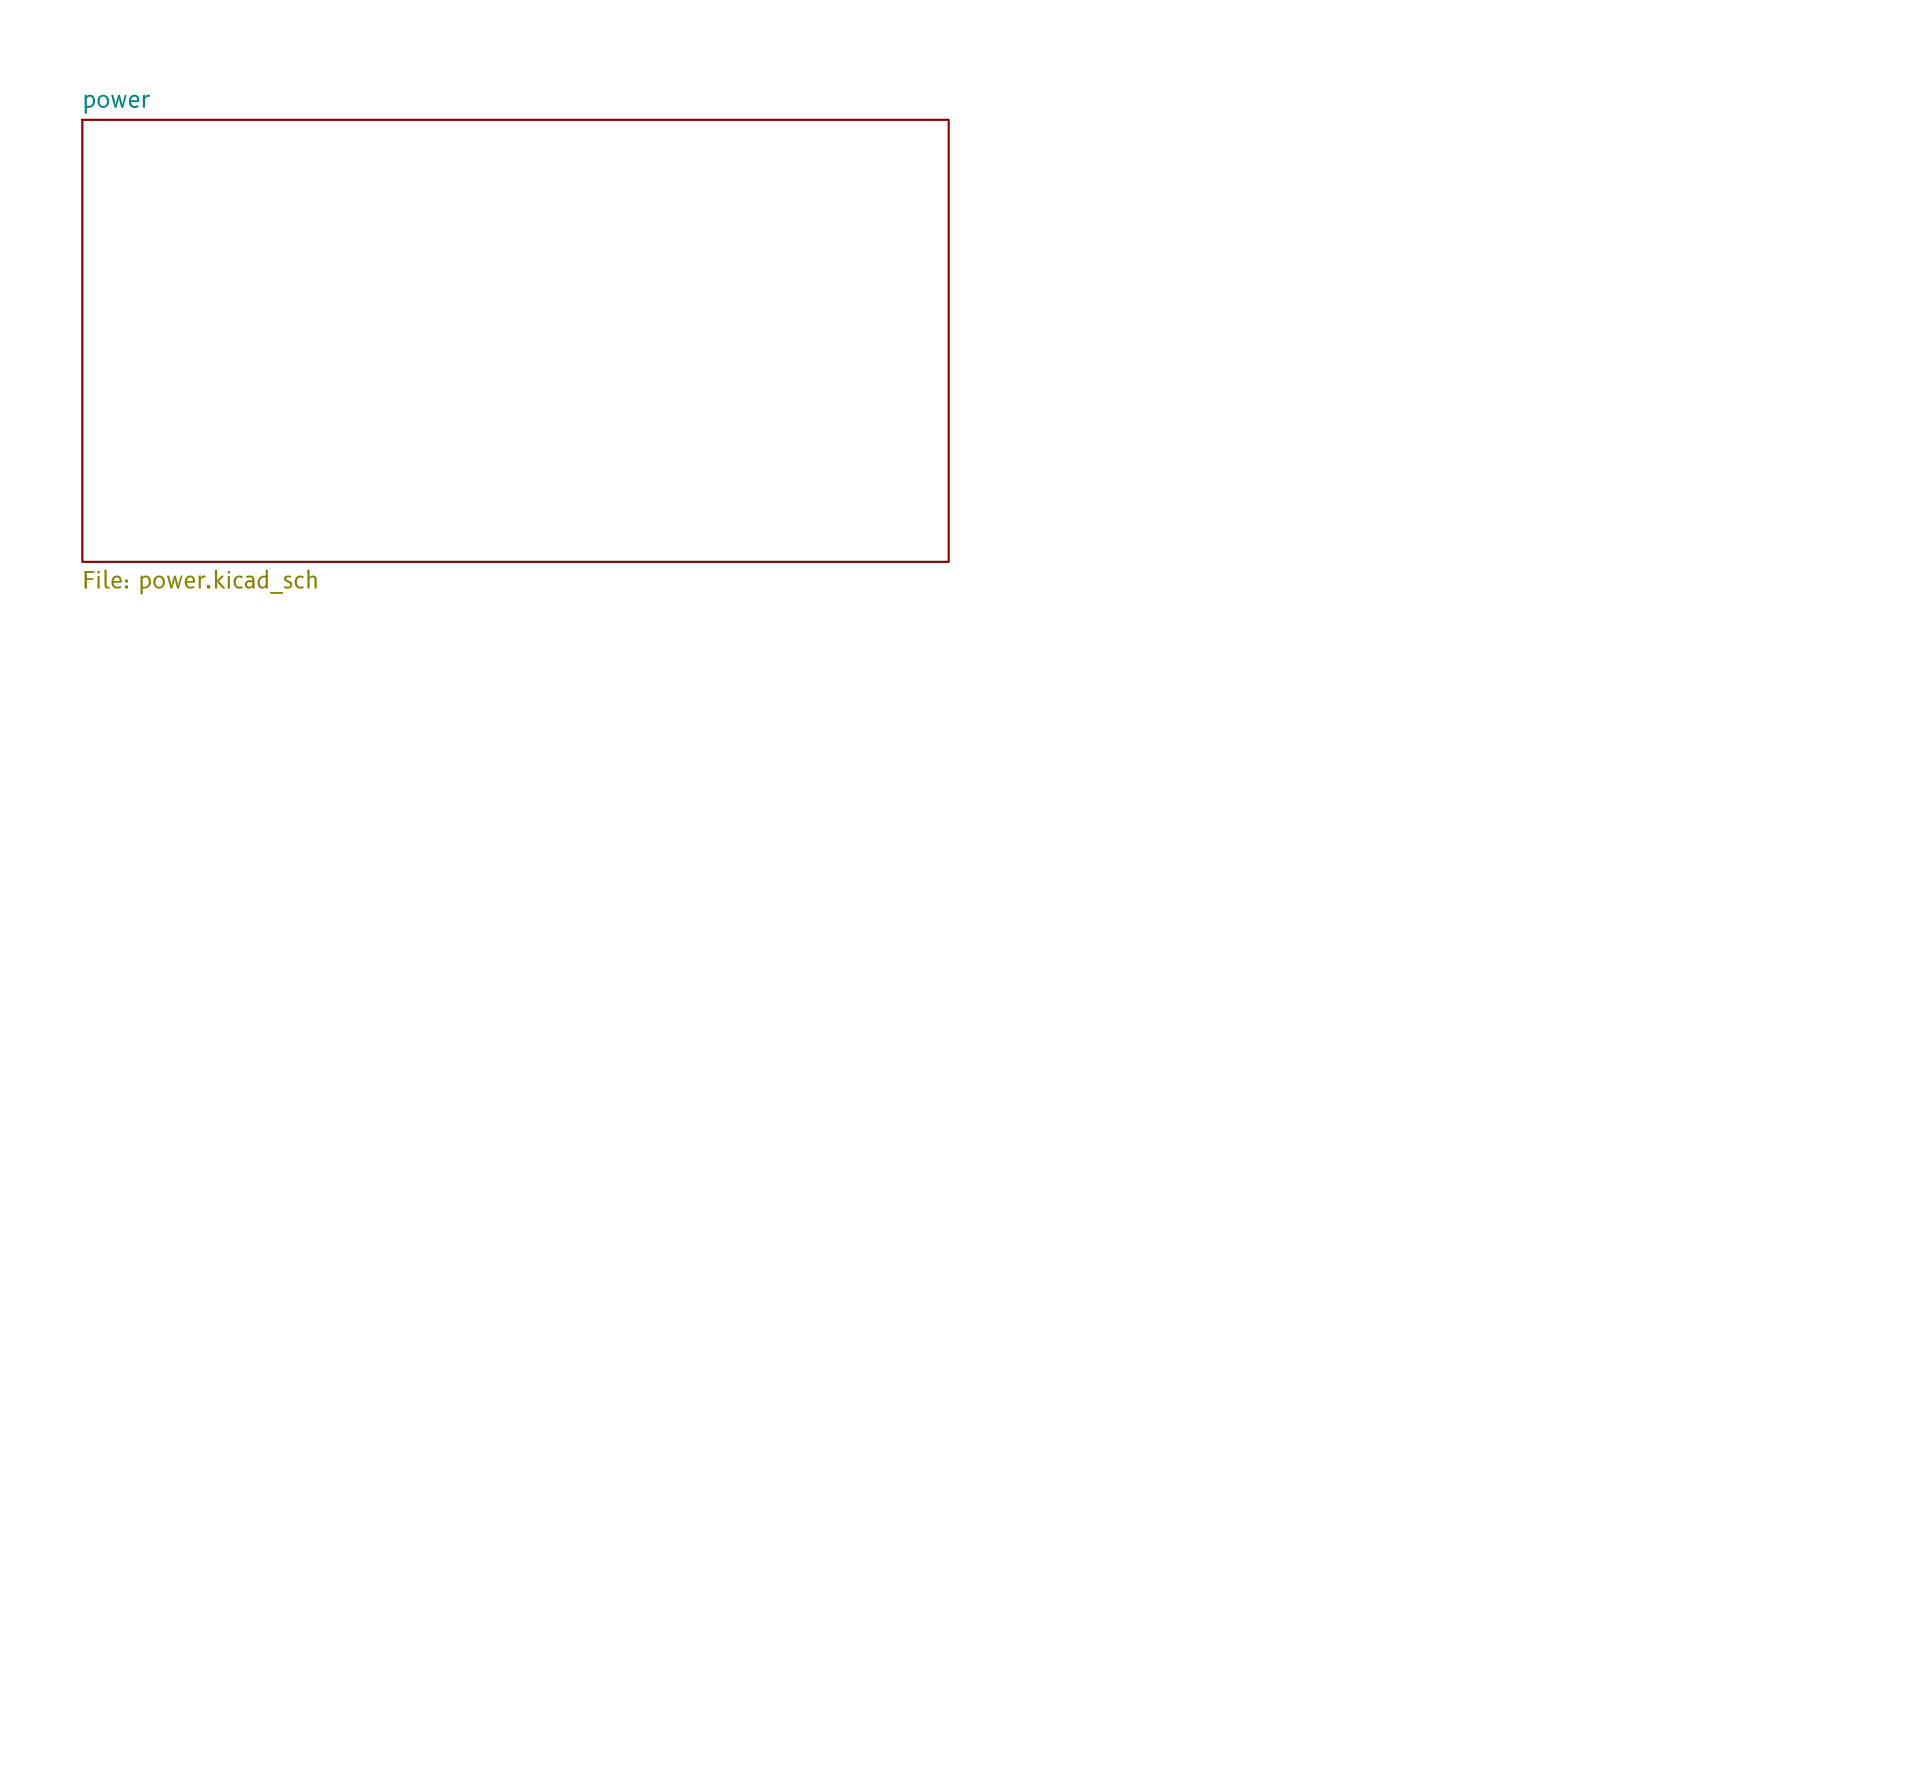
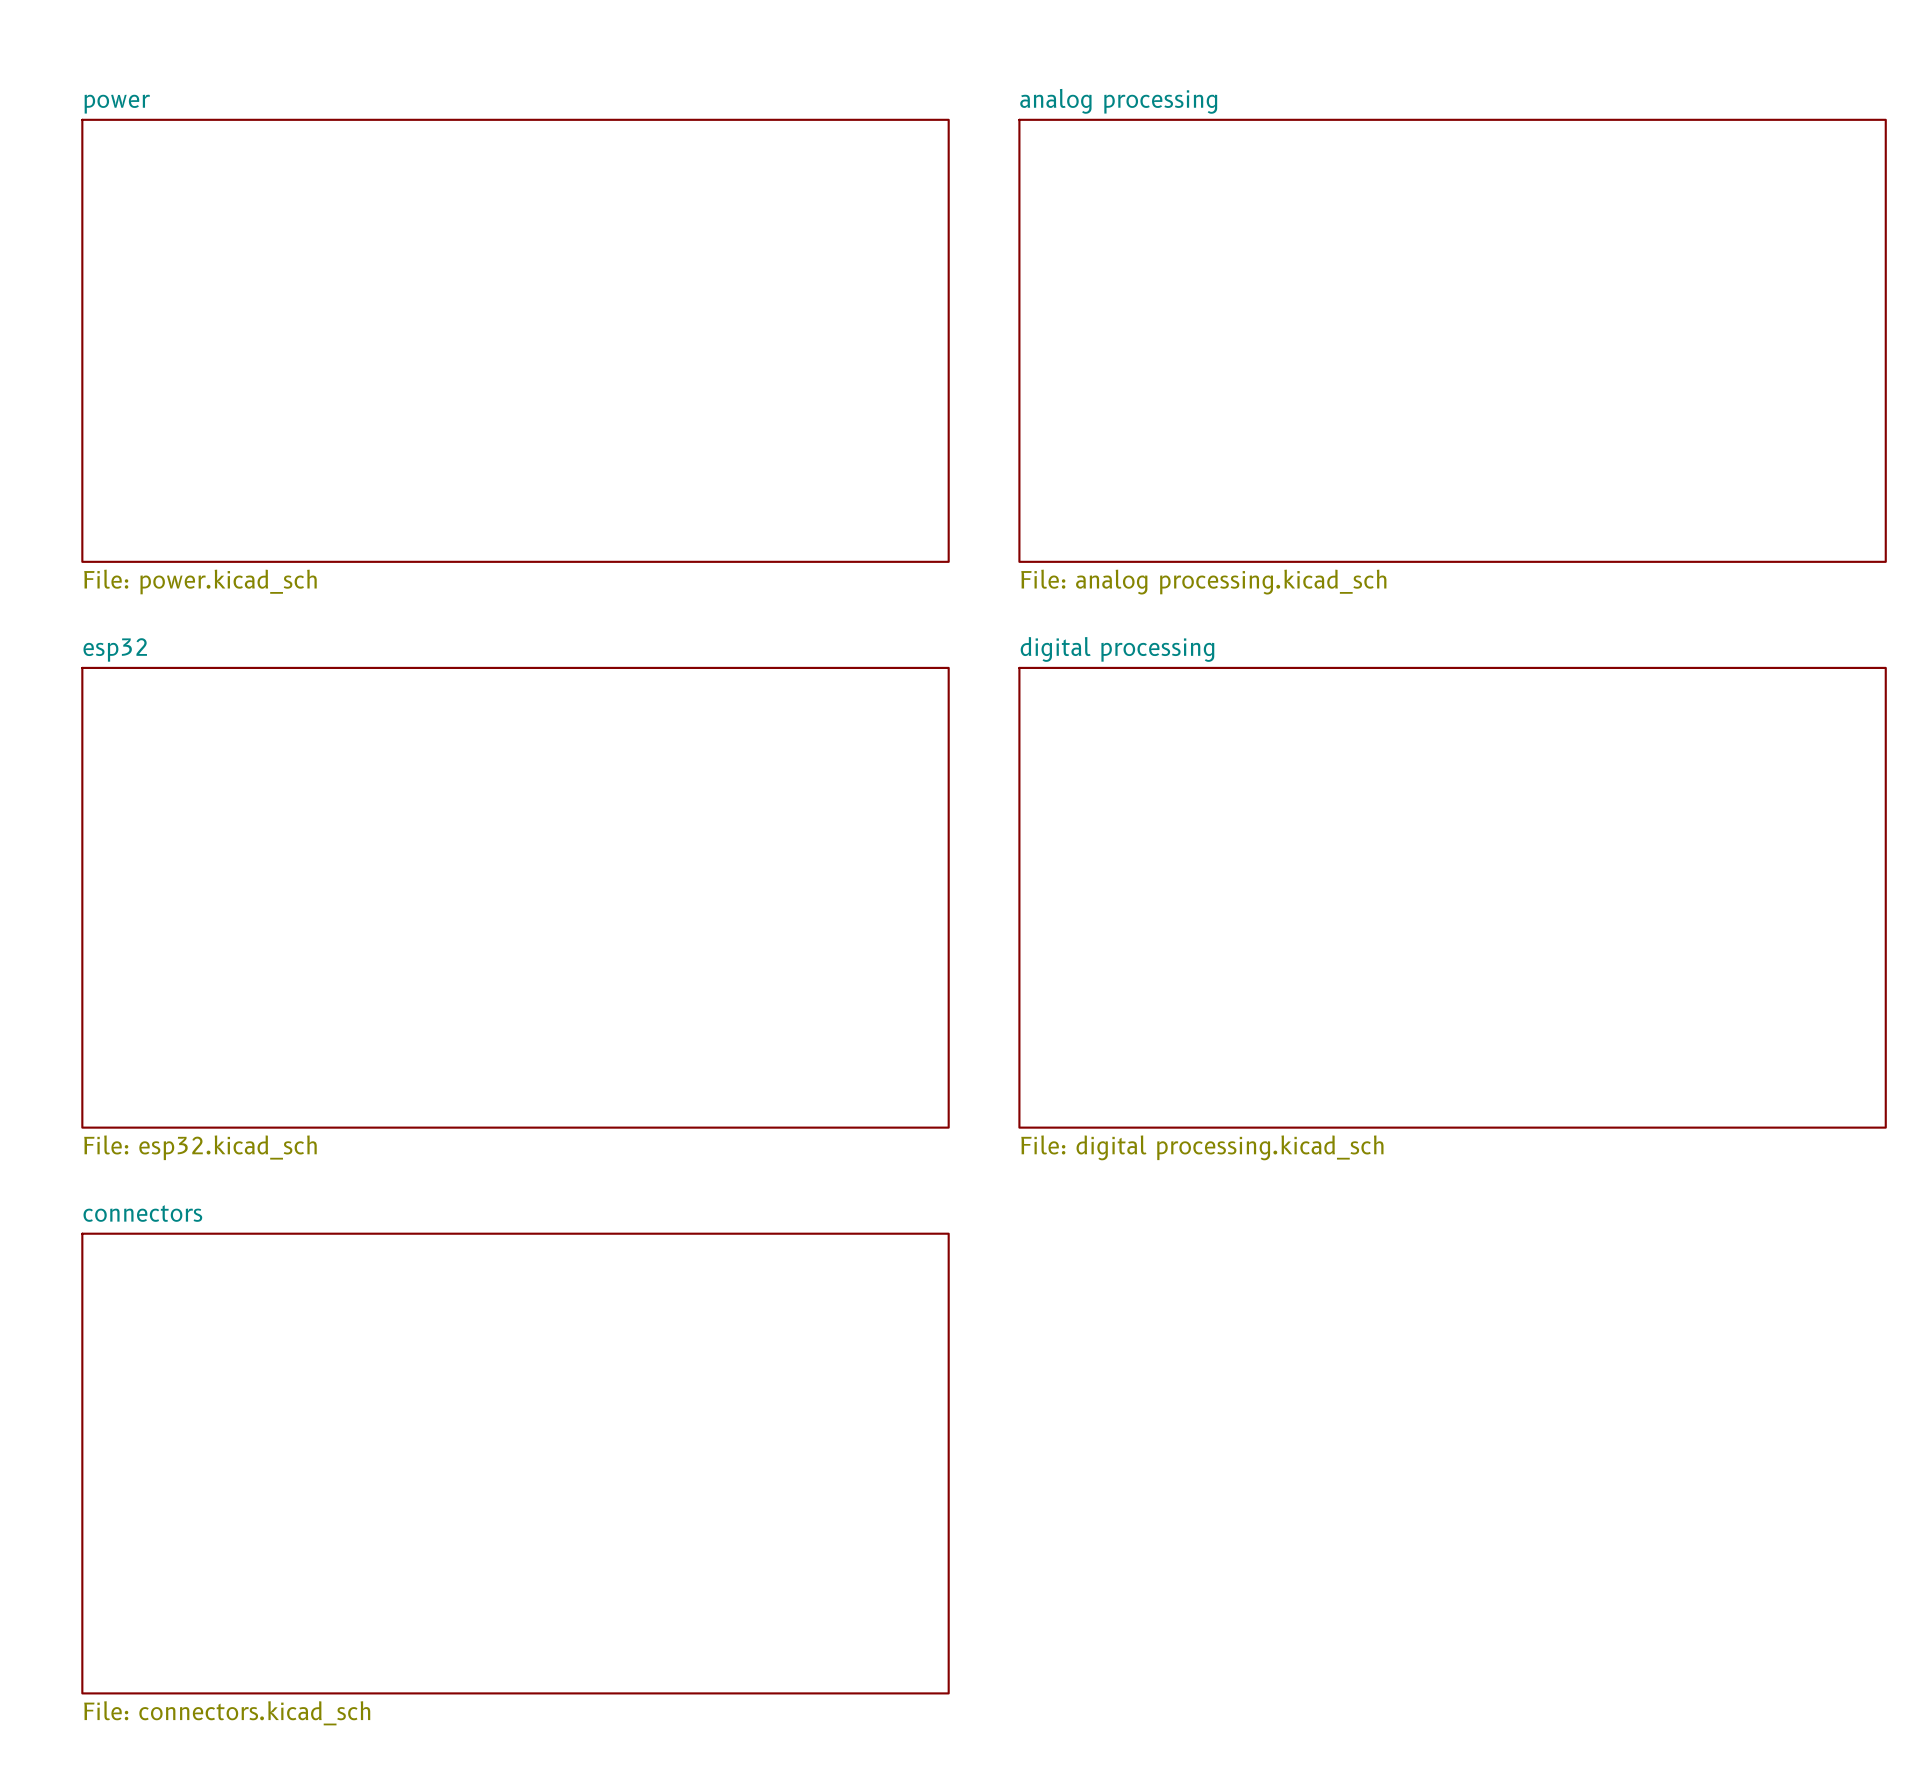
sheet analog processing: none -> File: analog processing.kicad_sch (1452, 340)
sheet esp32: none -> File: esp32.kicad_sch (515, 897)
sheet digital processing: none -> File: digital processing.kicad_sch (1452, 897)
sheet connectors: none -> File: connectors.kicad_sch (515, 1463)

